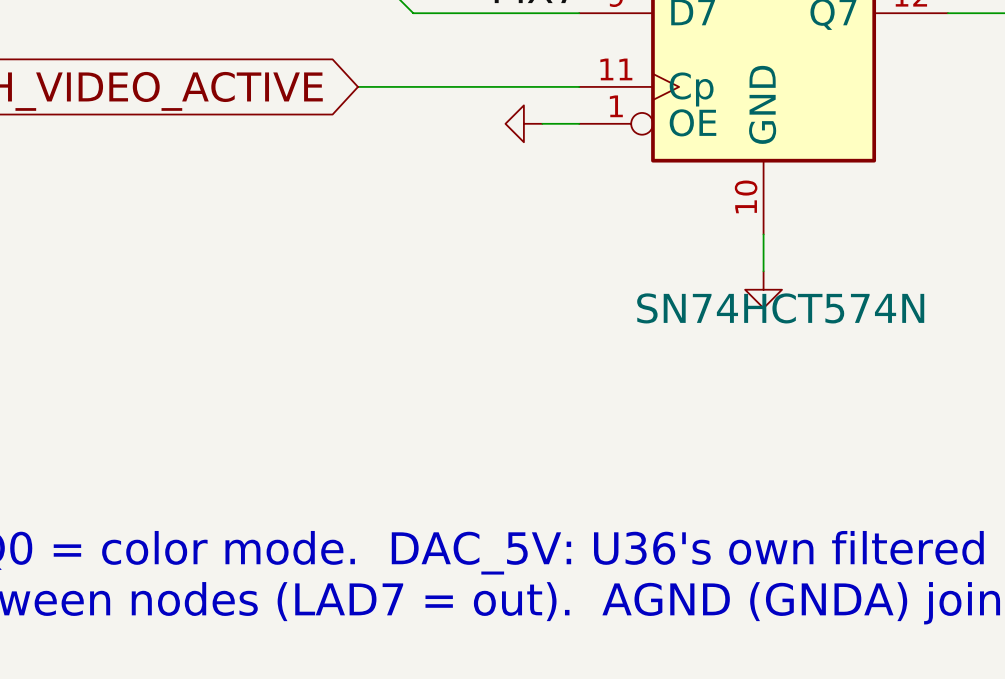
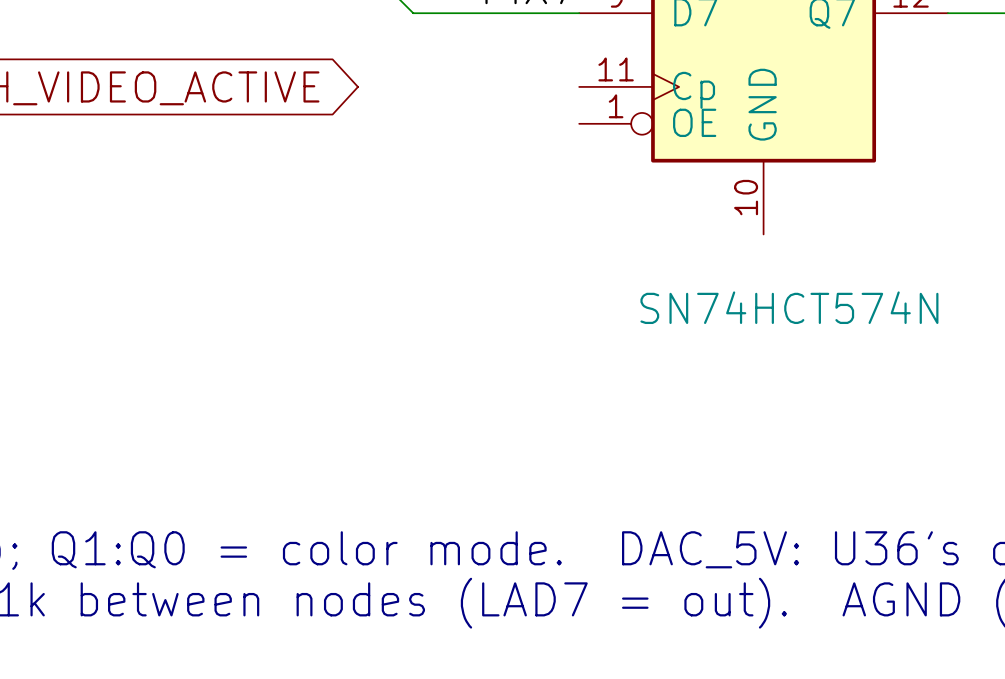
wire: (358, 86) (579, 86) -> none
power symbol: (523, 123) -> none
wire: (542, 123) (579, 123) -> none
wire: (763, 234) (763, 271) -> none
power symbol: (763, 289) -> none

